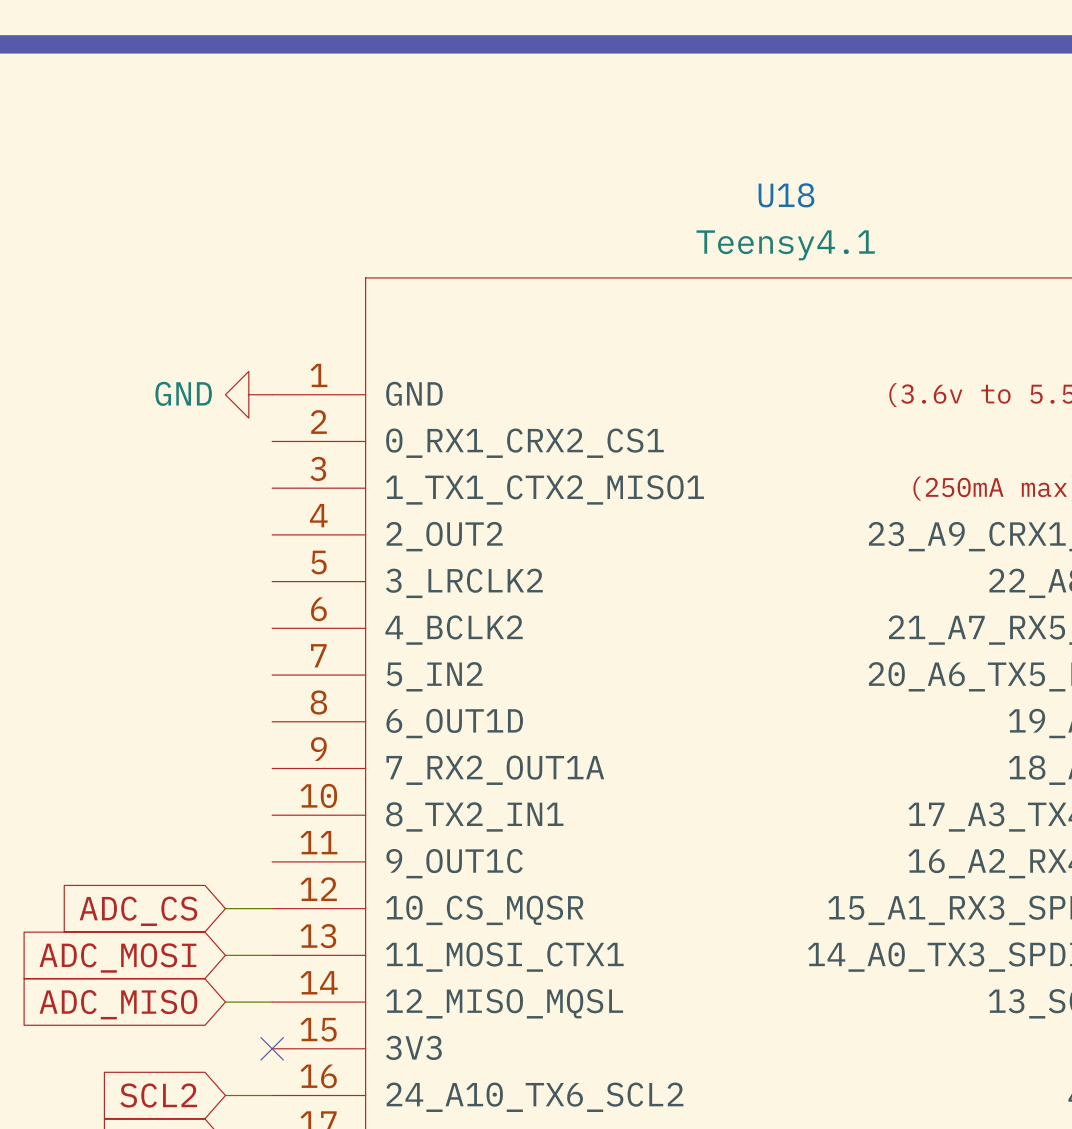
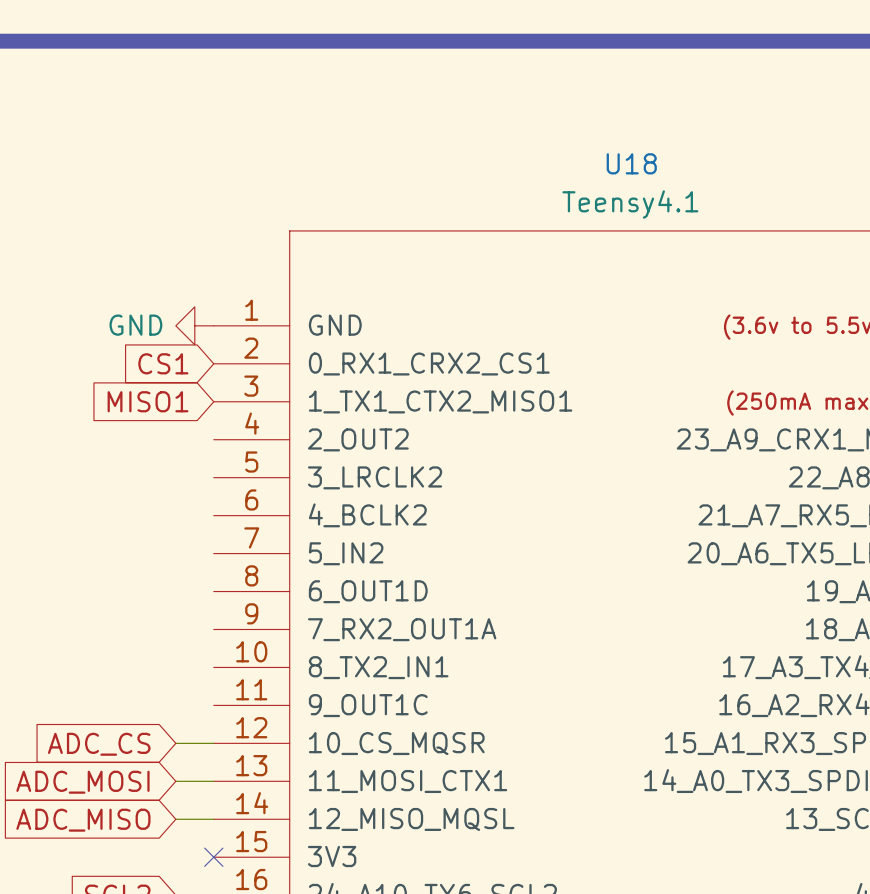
global label: none -> CS1 (163, 363)
global label: none -> MISO1 (148, 401)

